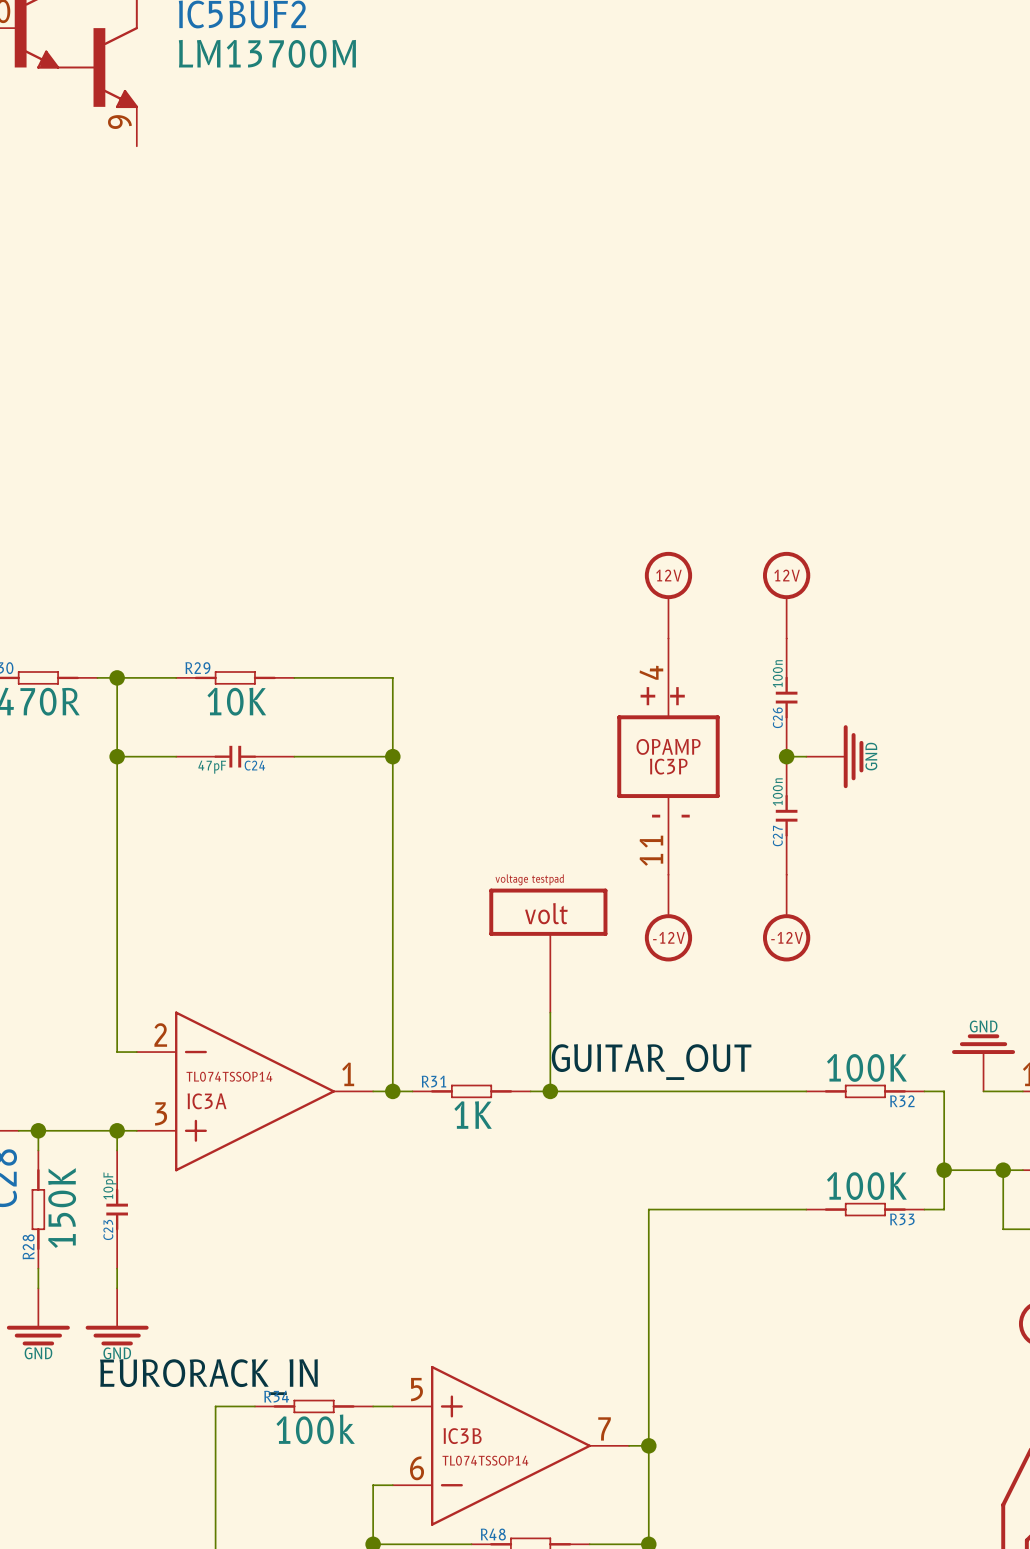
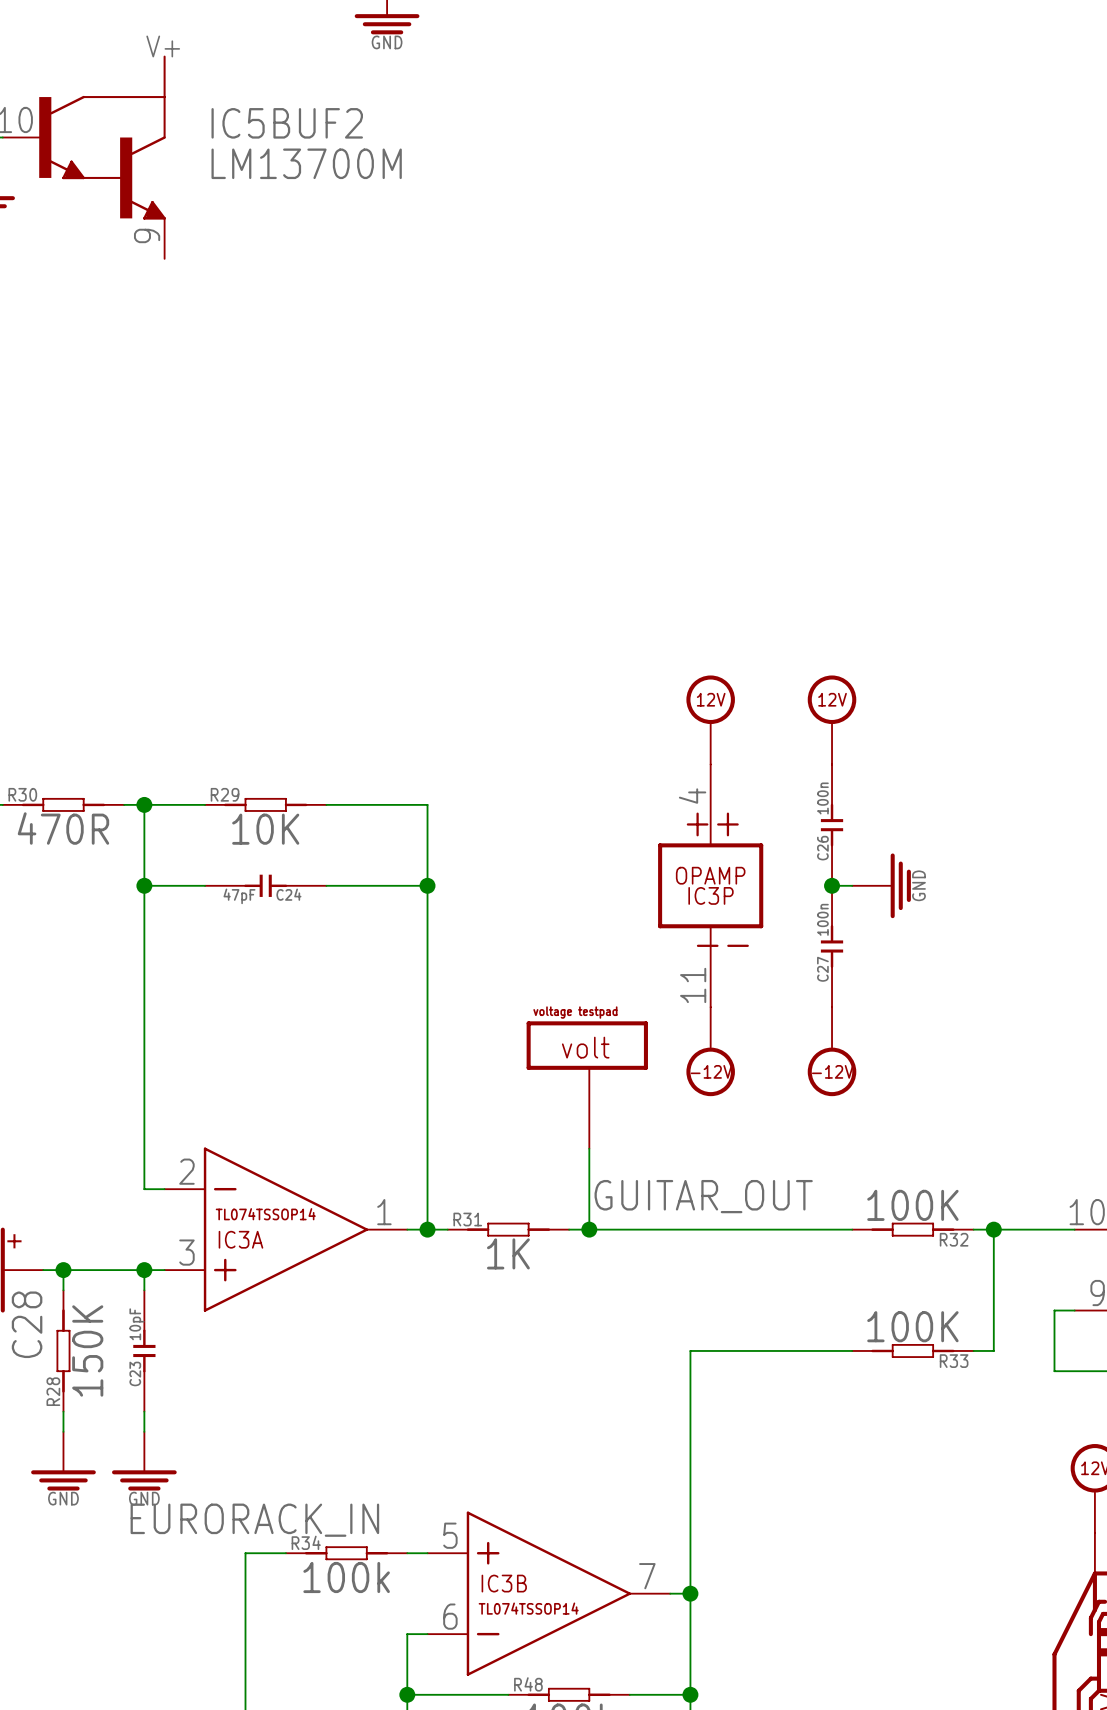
power symbol: GND (983, 1062) -> none
wire: none -> (993, 1229) (1034, 1229)
junction: none -> (993, 1229)
wire: (944, 1170) (1003, 1170) -> none
junction: (944, 1170) -> none
junction: (1003, 1170) -> none

